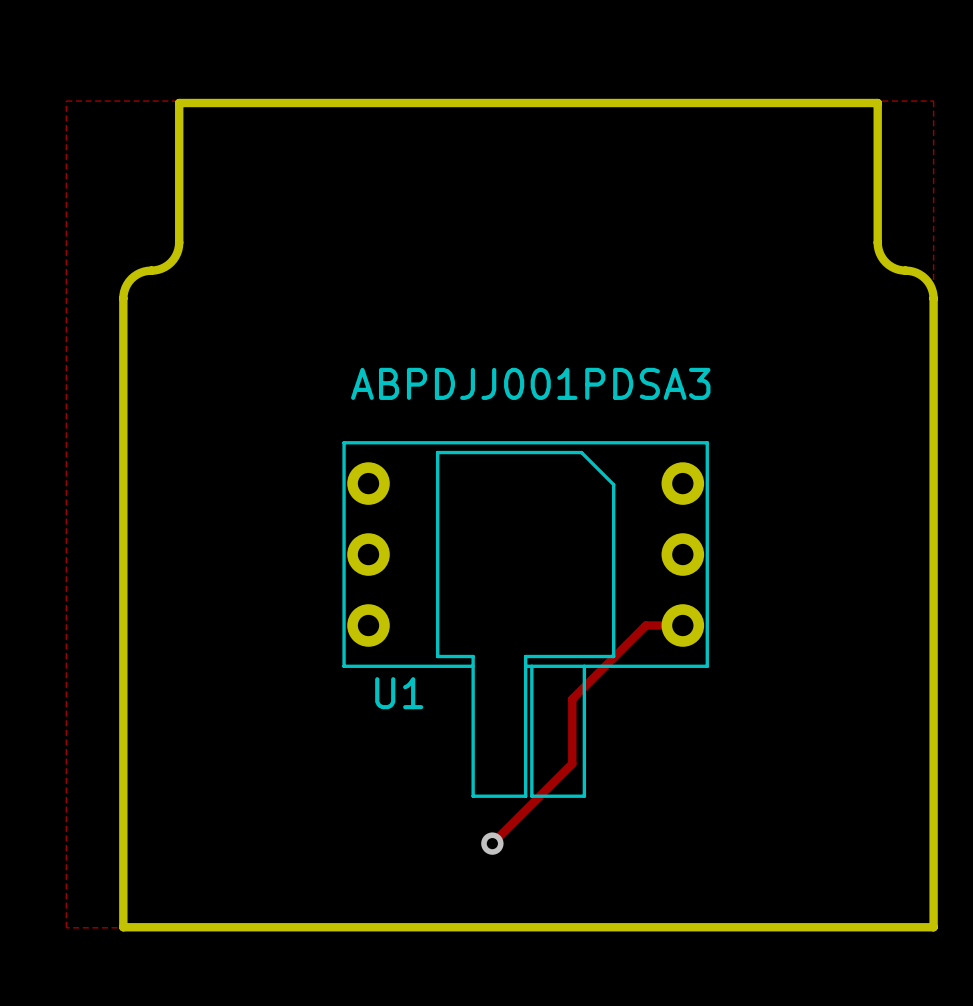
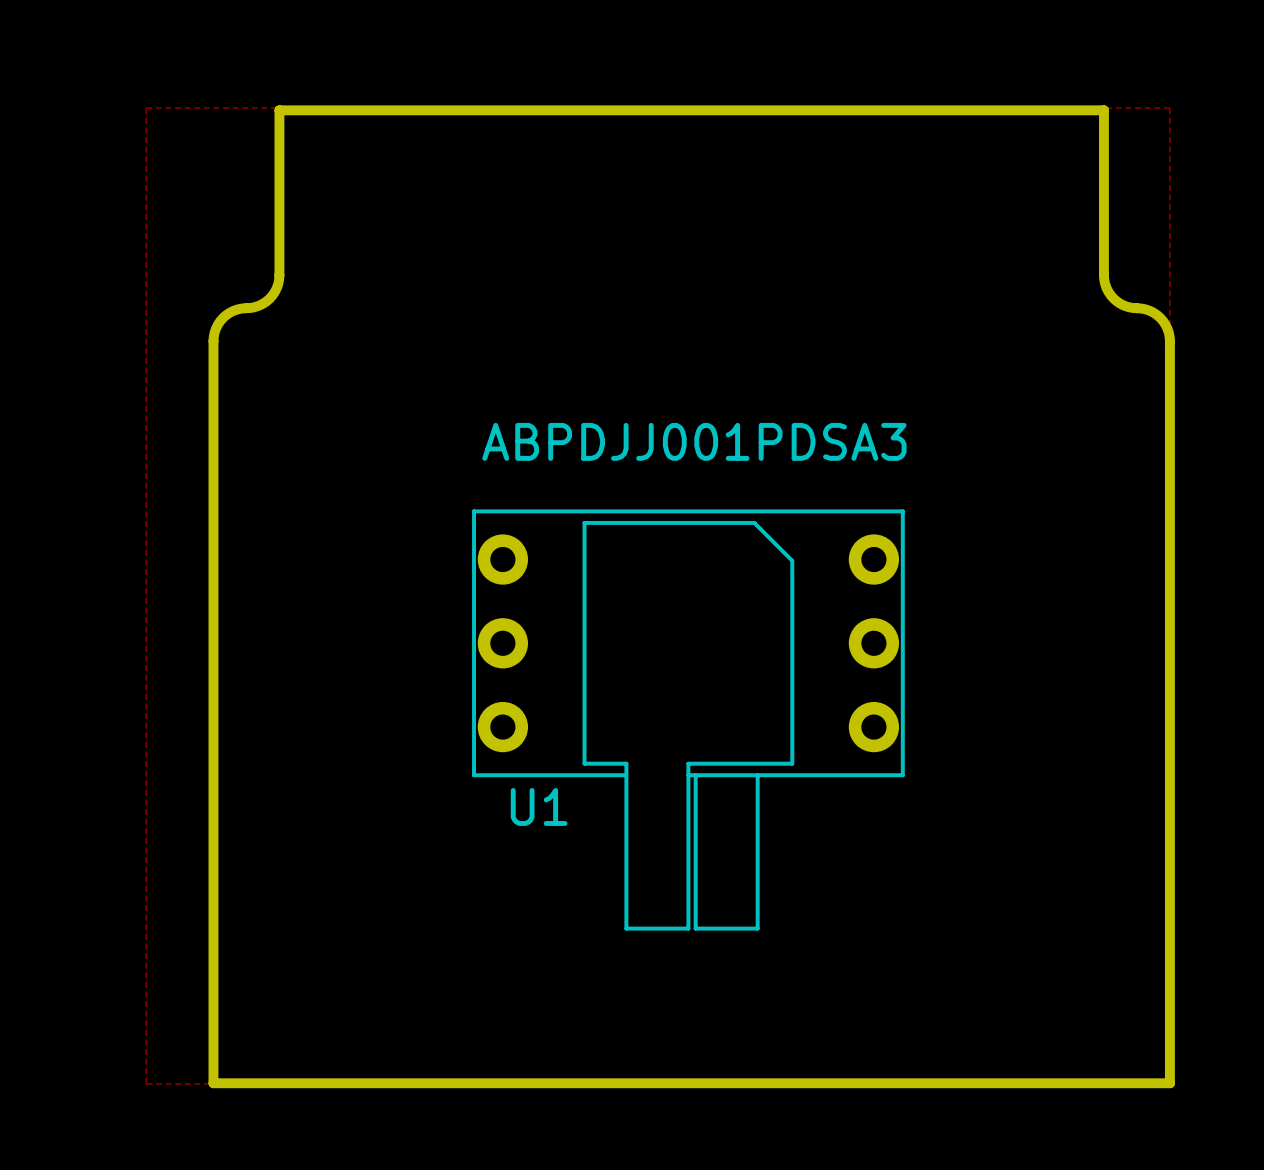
track: (682, 625) (645, 625) (572, 699) (572, 763) (492, 843) -> none
via: (492, 843) -> none

